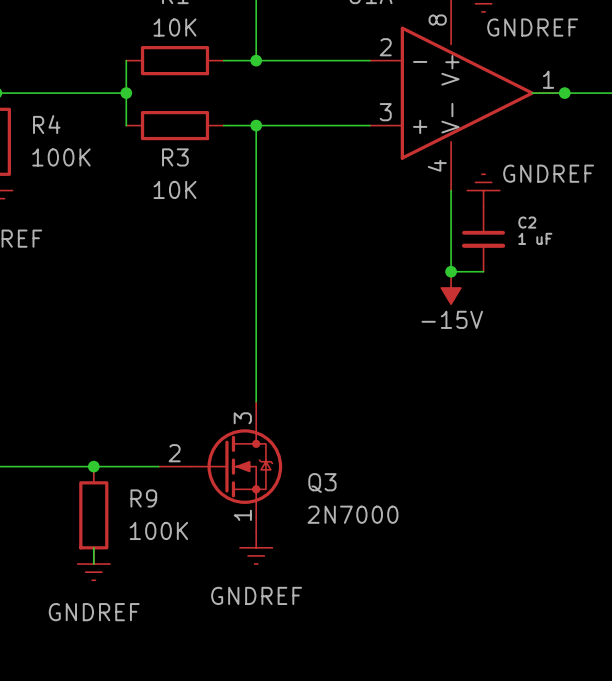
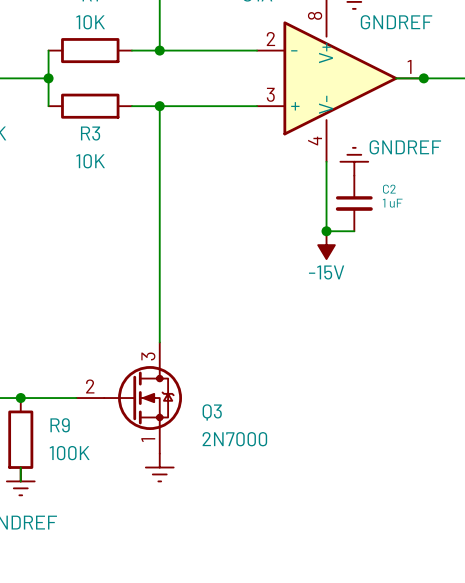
power symbol text: GNDREF (256, 595) -> none

